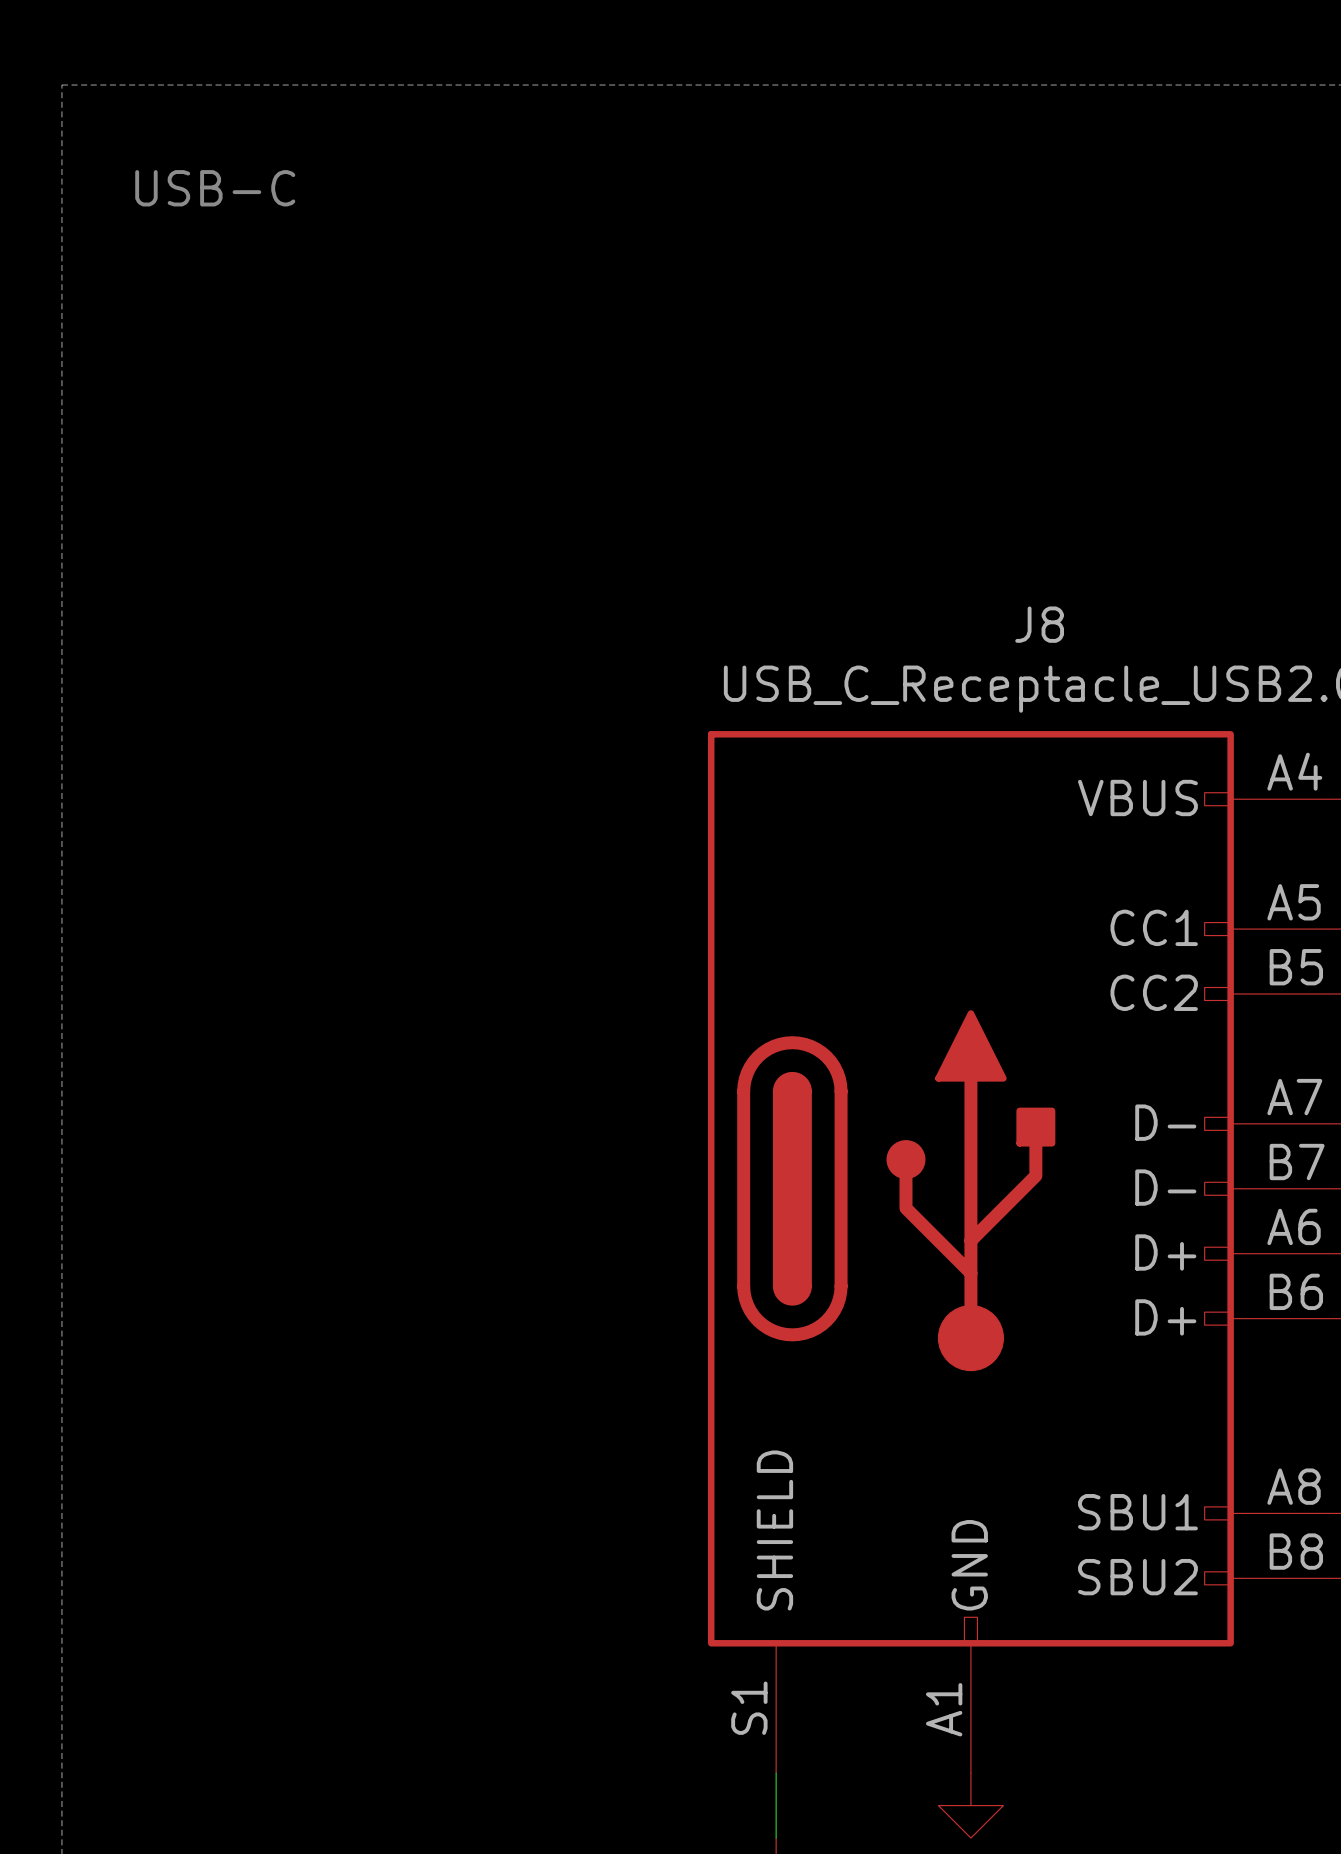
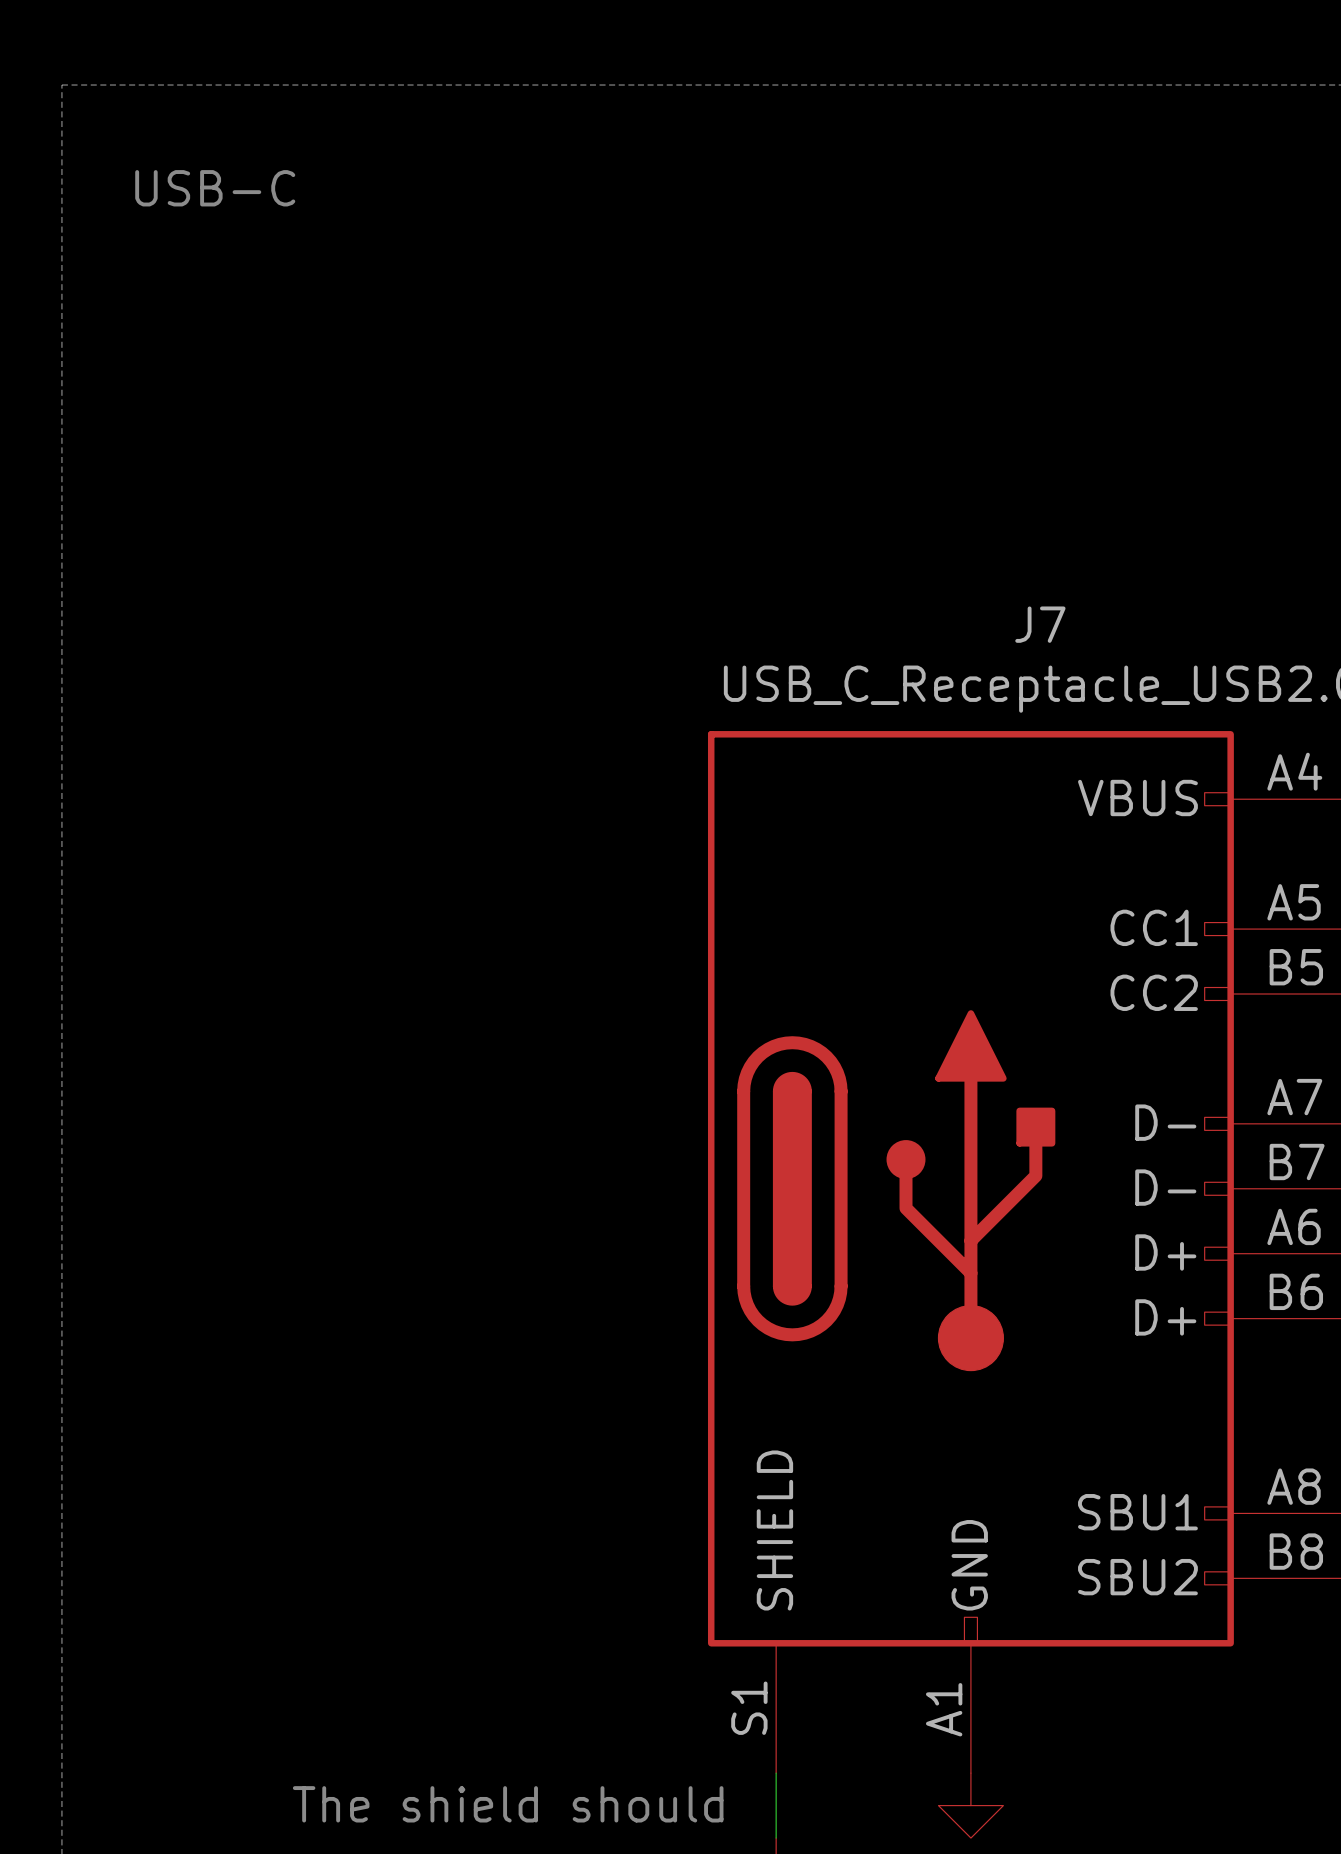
J8 name: J8 (1039, 624) -> J7 (1040, 624)
text: none -> The shield should (508, 1804)

